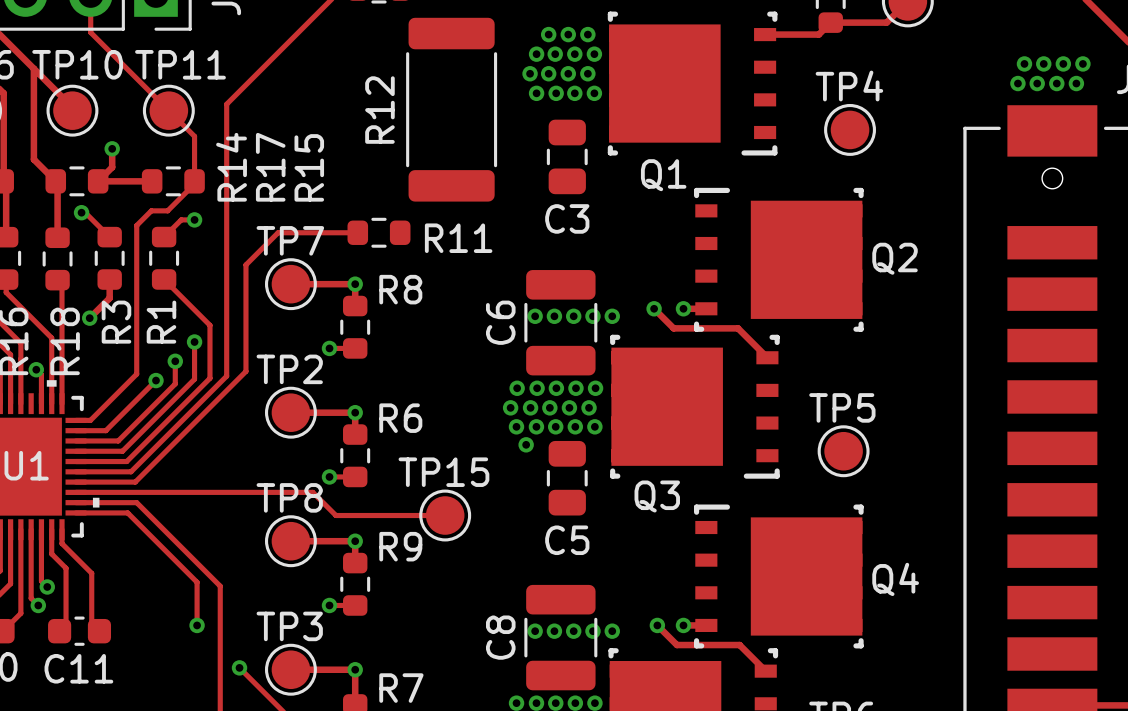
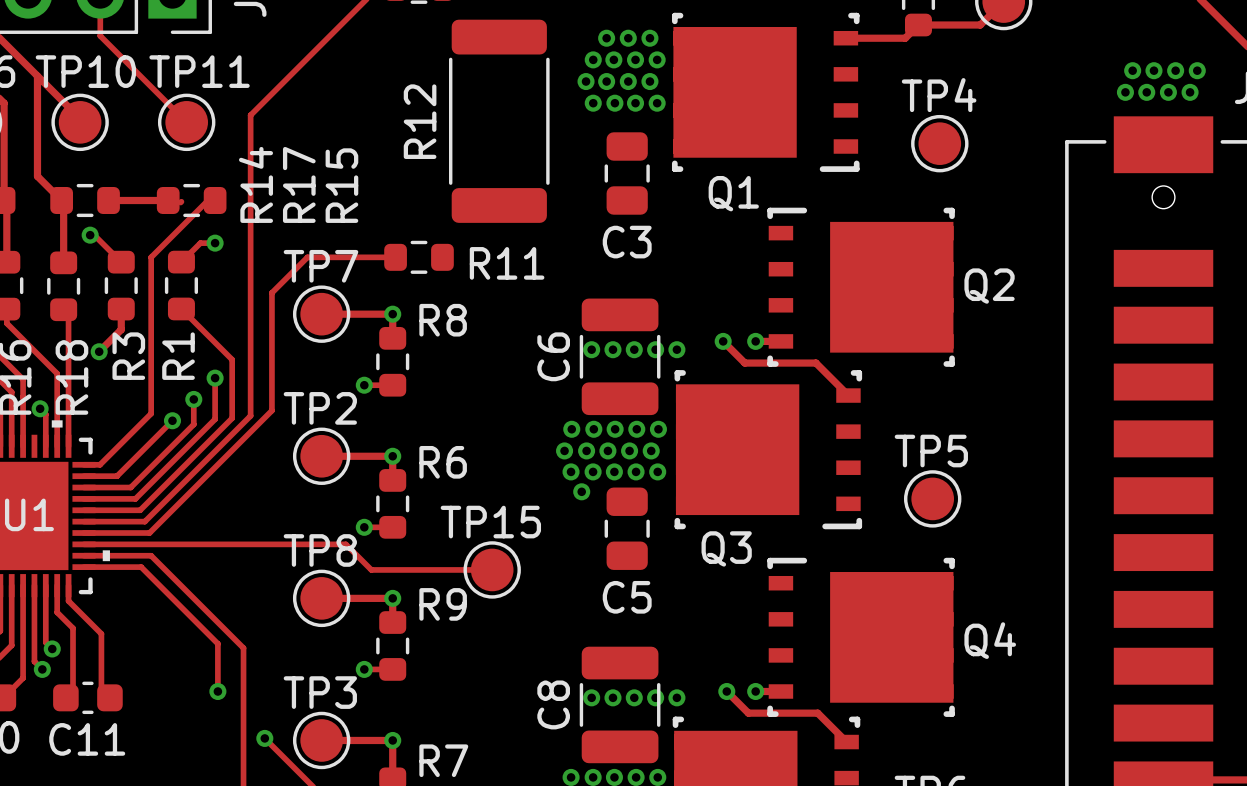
track: (168, 110) (194, 136) (194, 183) (167, 210) (151, 210) (136, 225) (136, 232) -> (215, 200) (208, 200) (151, 257)
track: (112, 148) (112, 167) (98, 181) -> none
via: (112, 148) -> none
track: none -> (181, 201) (180, 202)

